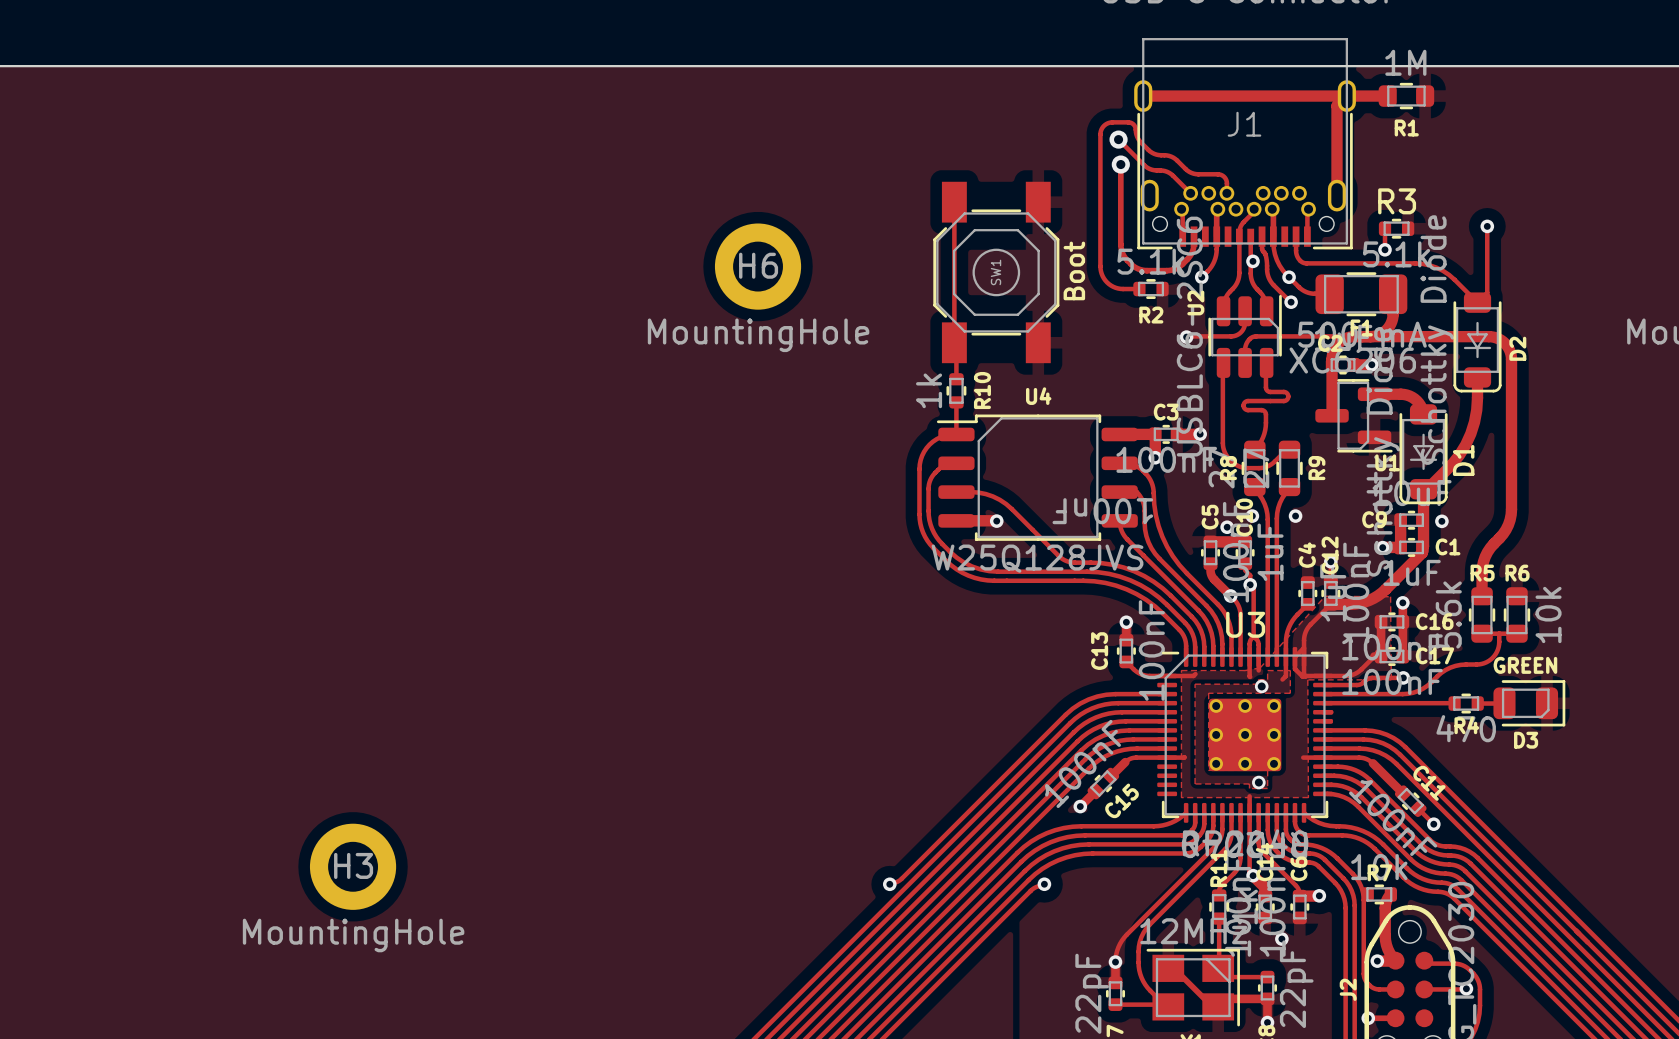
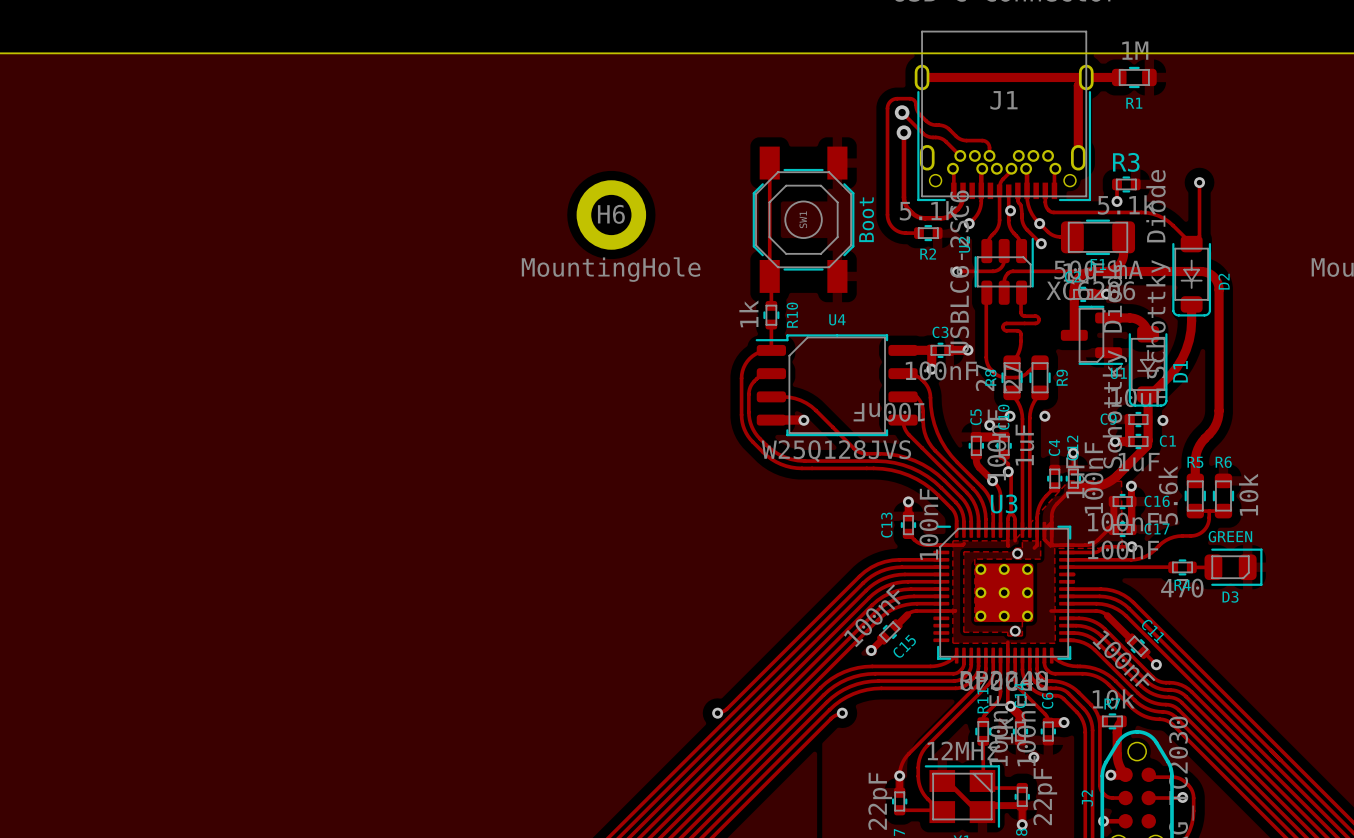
H3: MountingHole (353, 866) -> none

